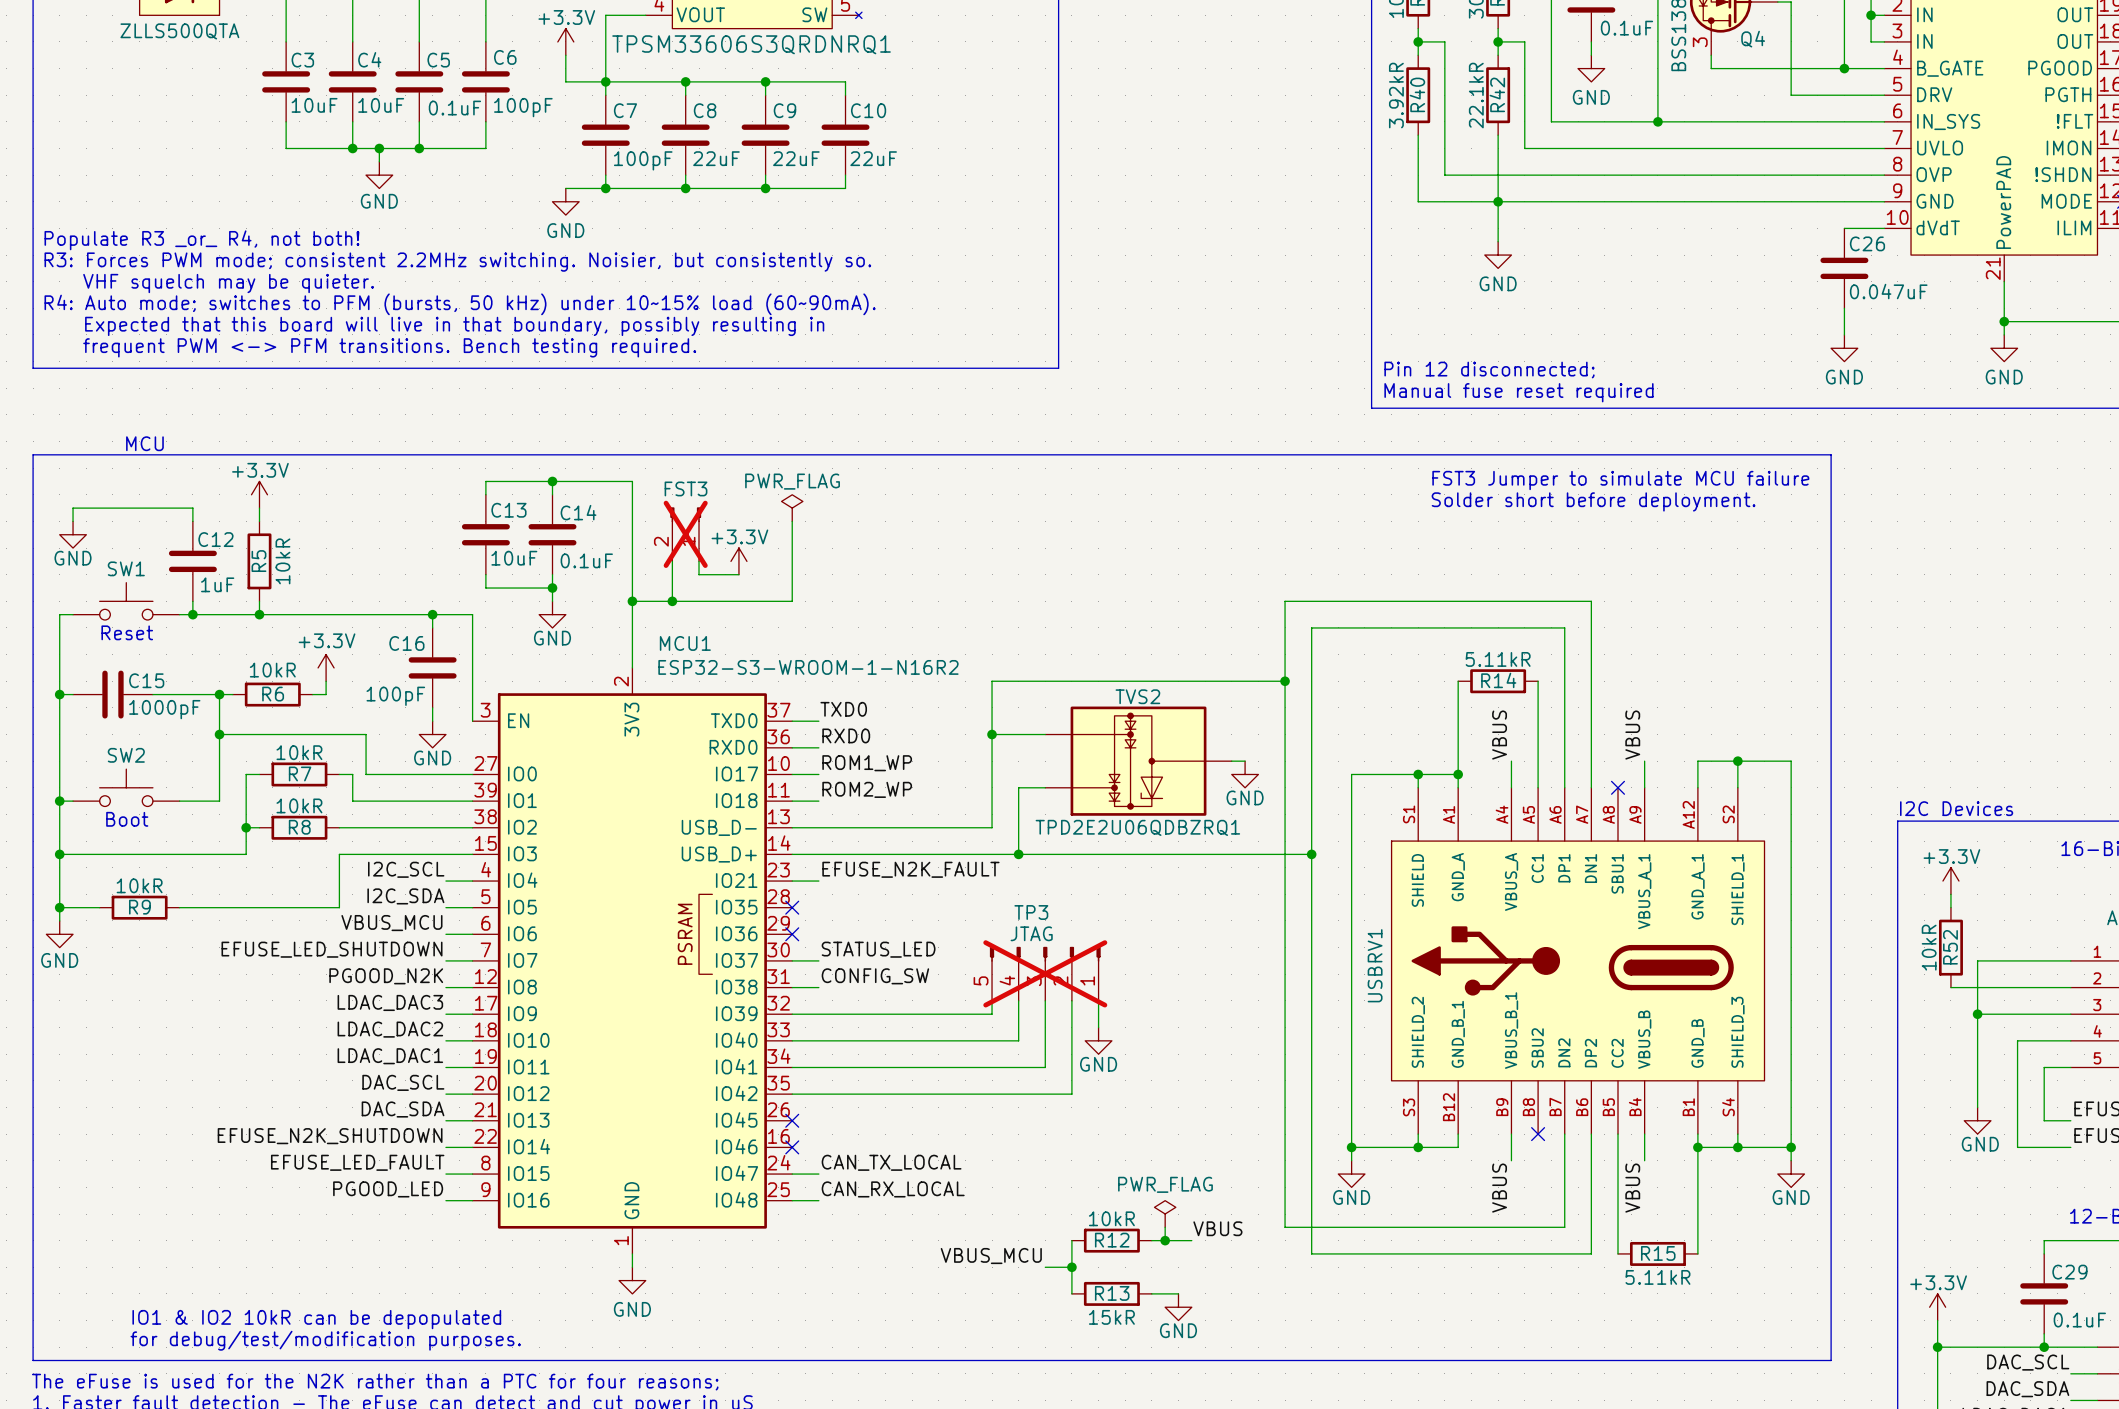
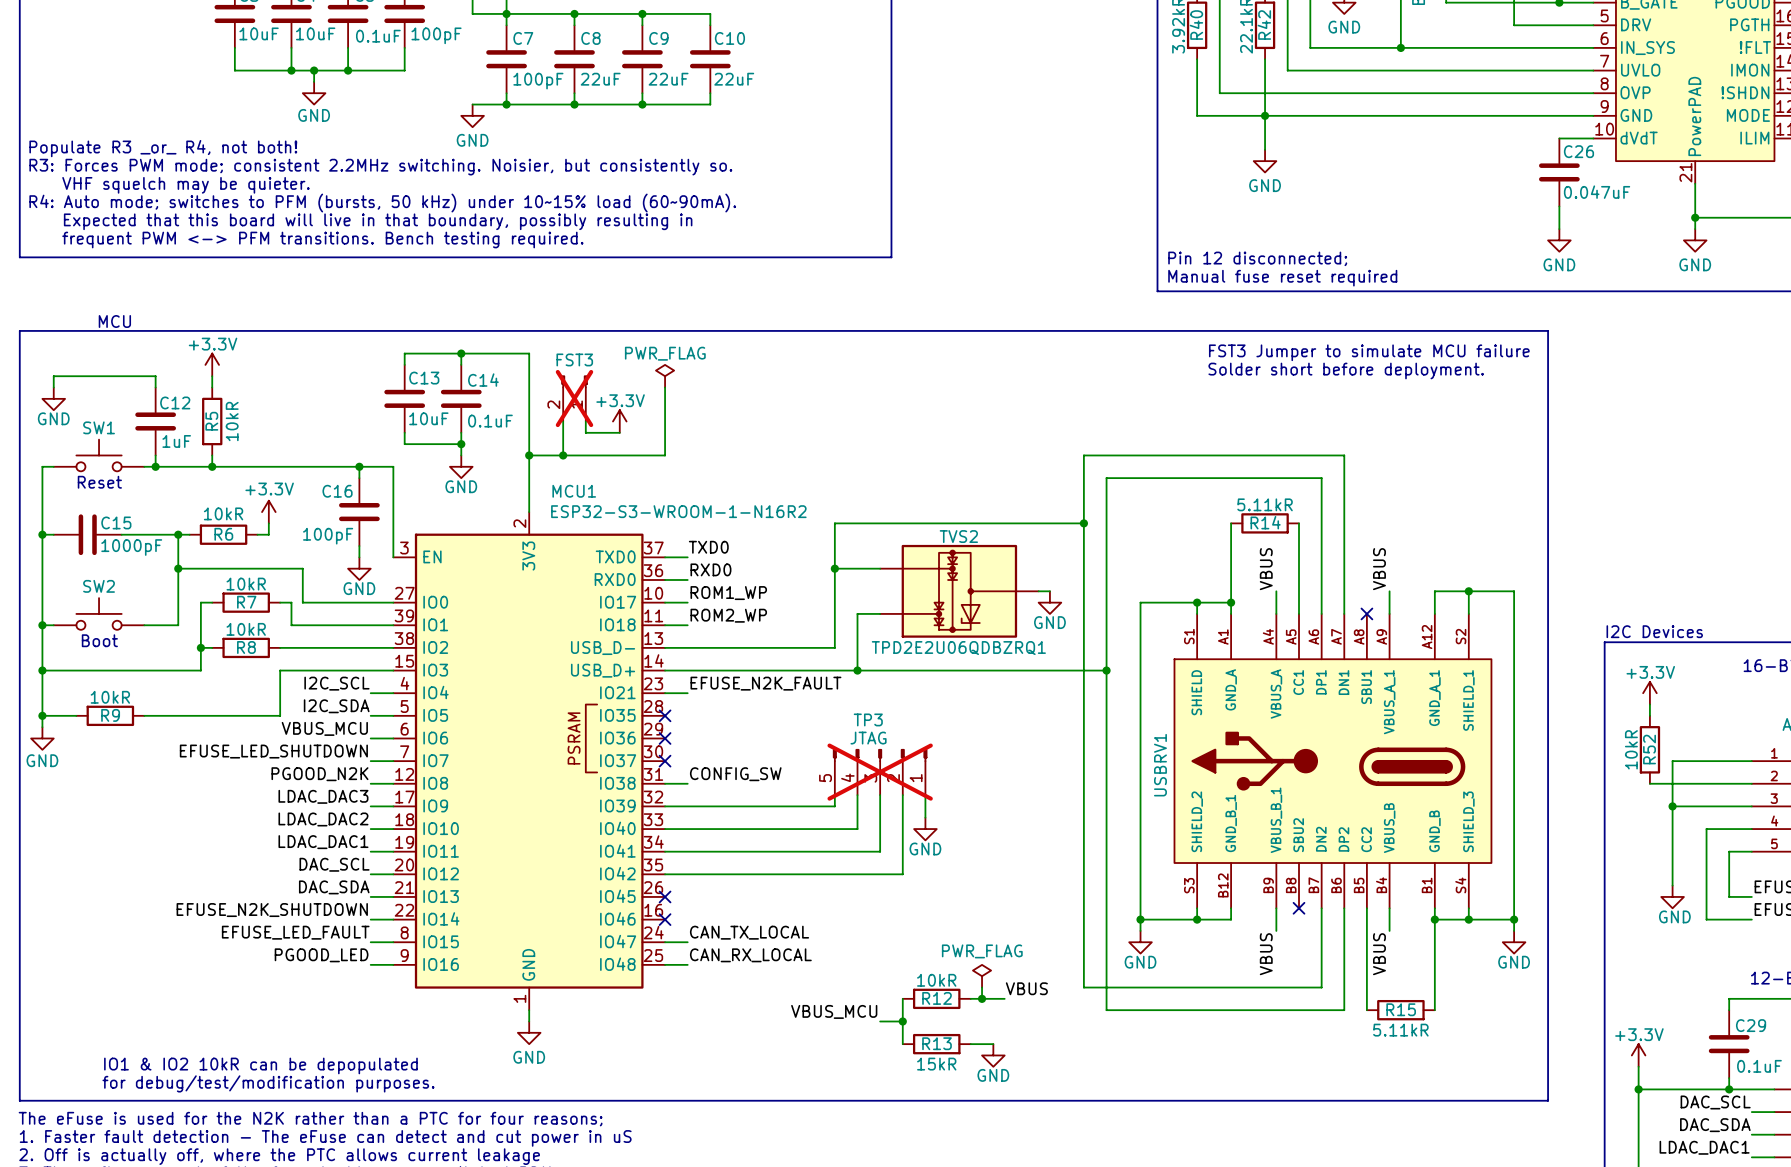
label: STATUS_LED (878, 949) -> none
wire: (792, 960) (818, 960) -> none
no-connect mark: none -> (665, 761)

